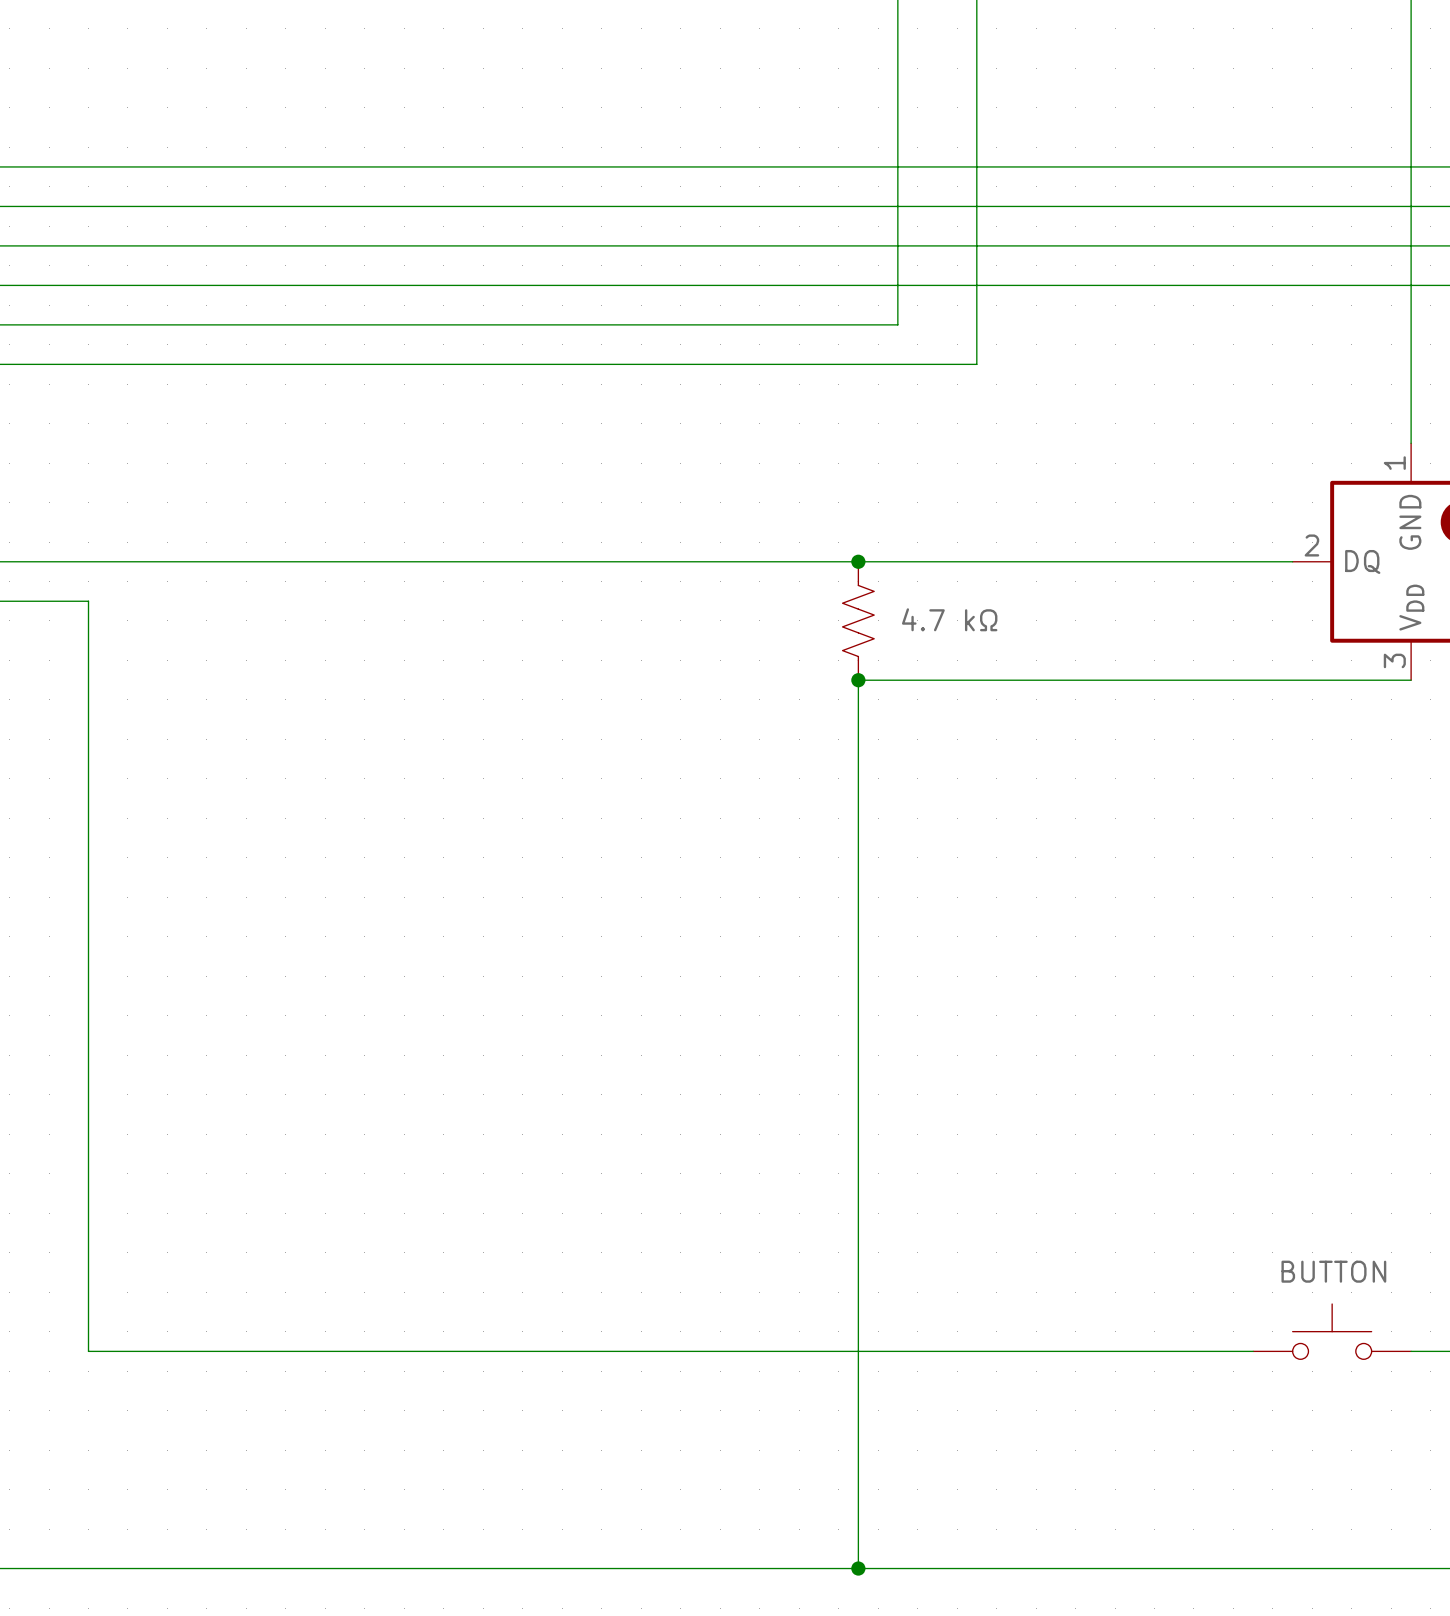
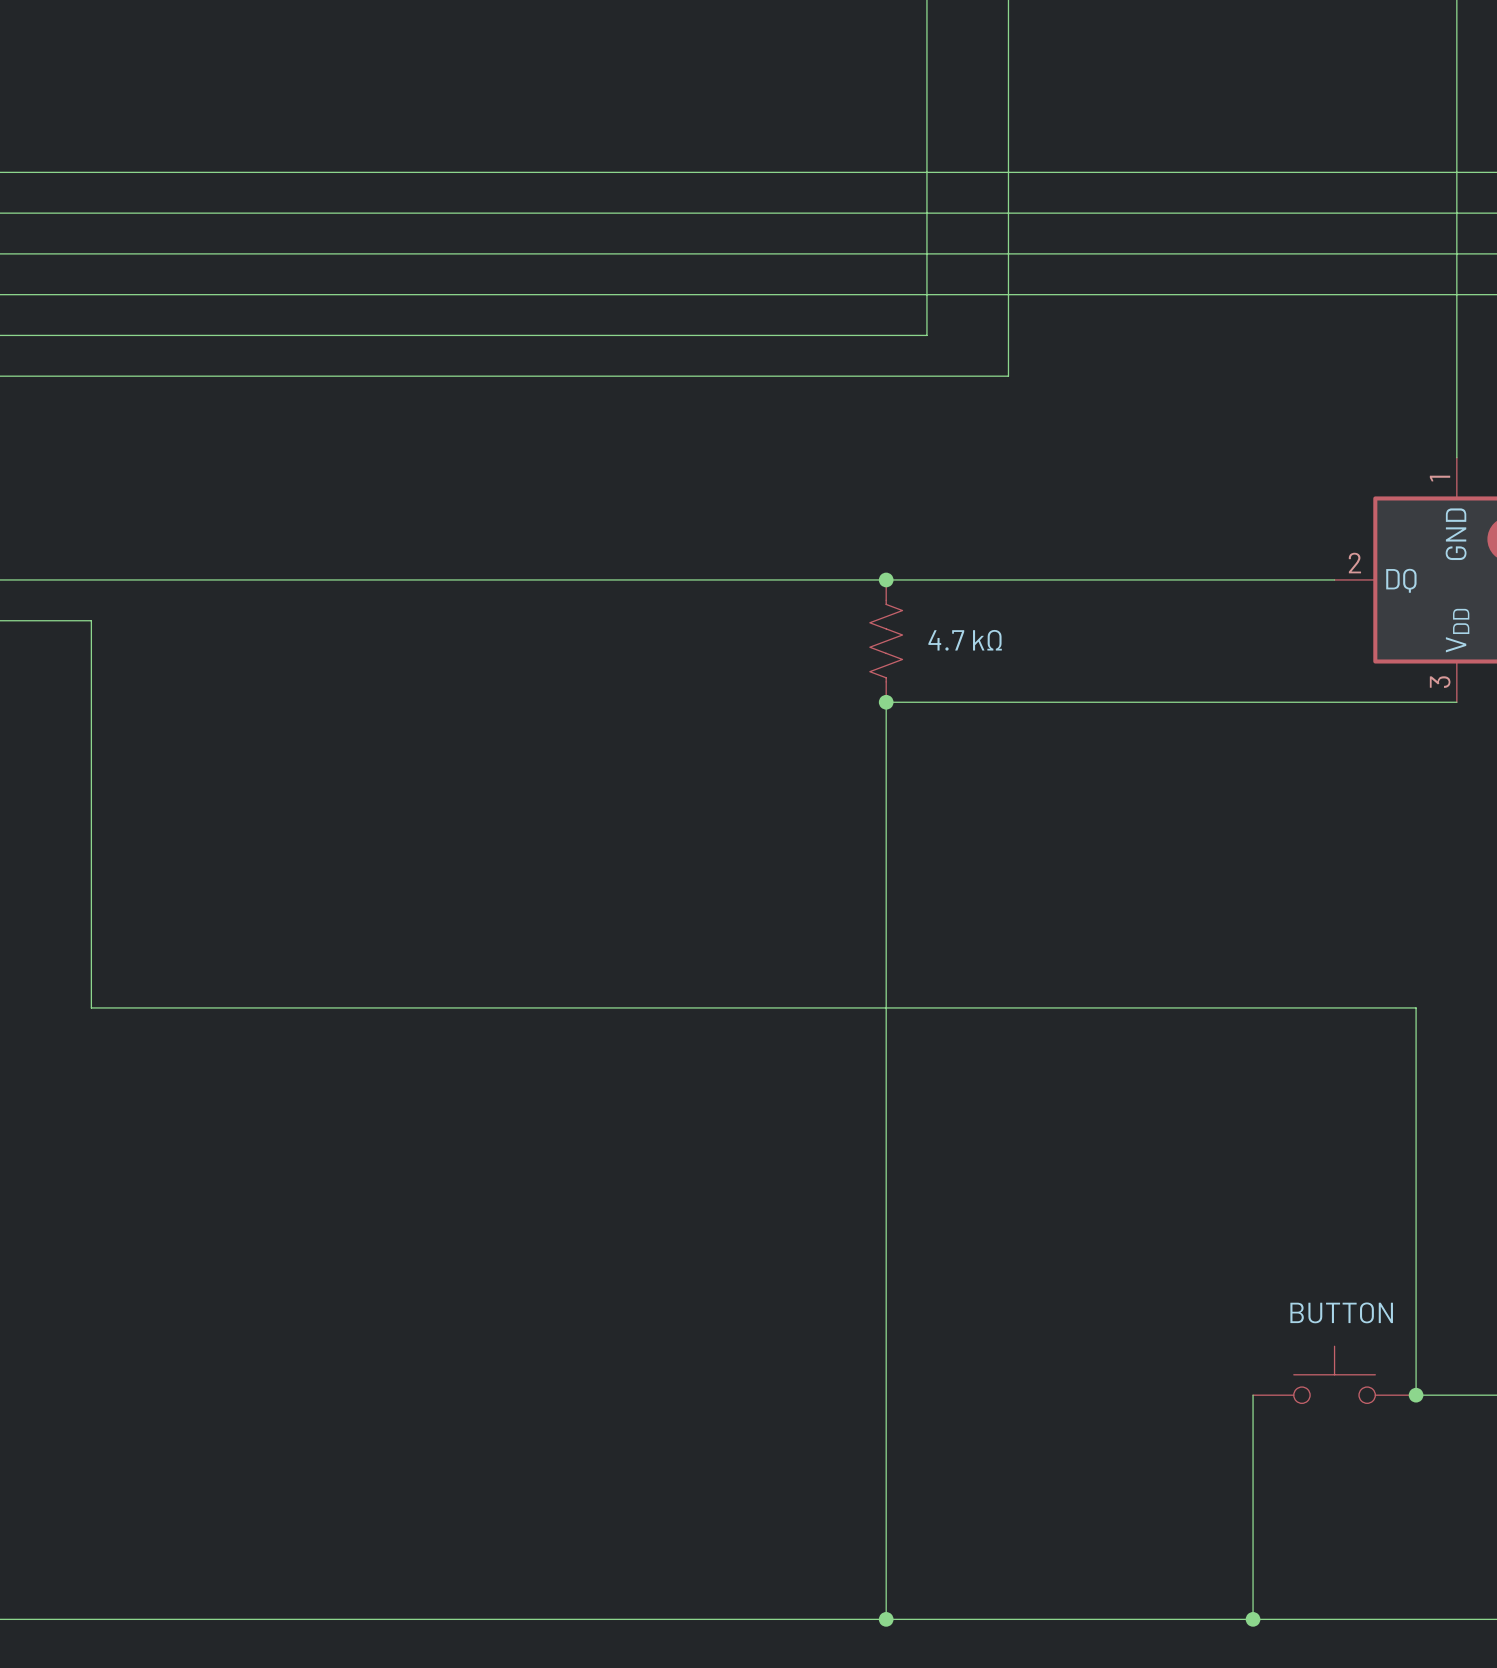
wire: (88, 976) (88, 1351) (1253, 1351) -> (91, 1007) (1416, 1007) (1416, 1395) (1456, 1395)
part position: (1332, 1331) -> (1334, 1374)
wire: none -> (1253, 1395) (1253, 1619)
junction: none -> (1416, 1395)
junction: none -> (1253, 1619)

